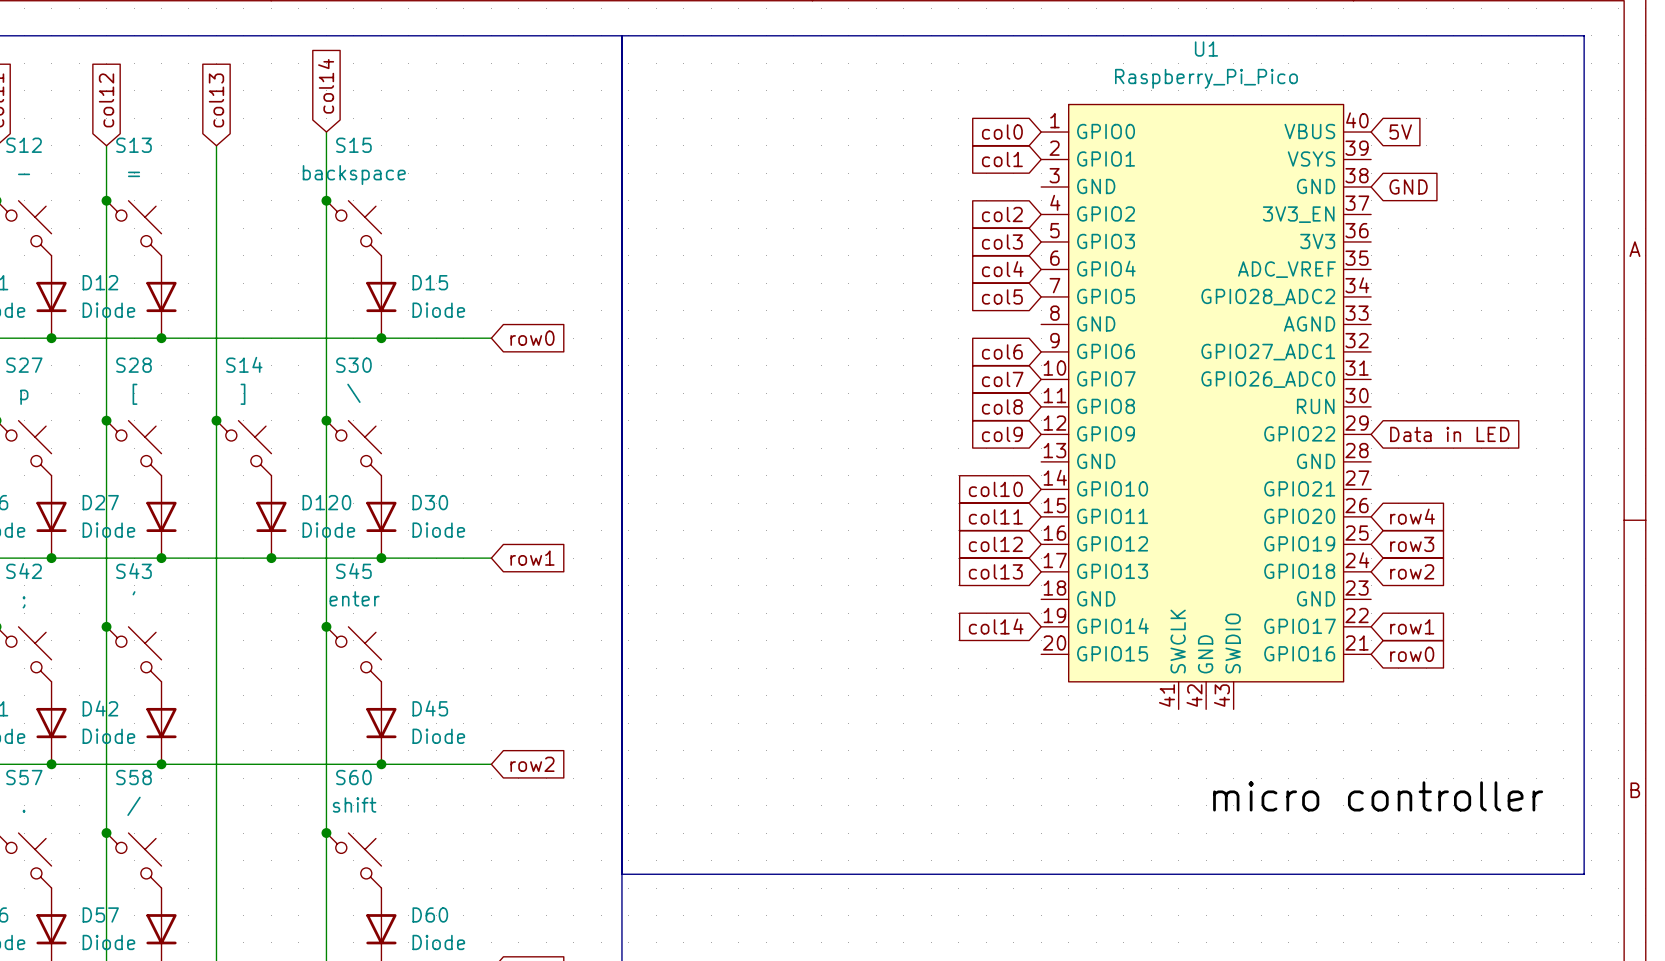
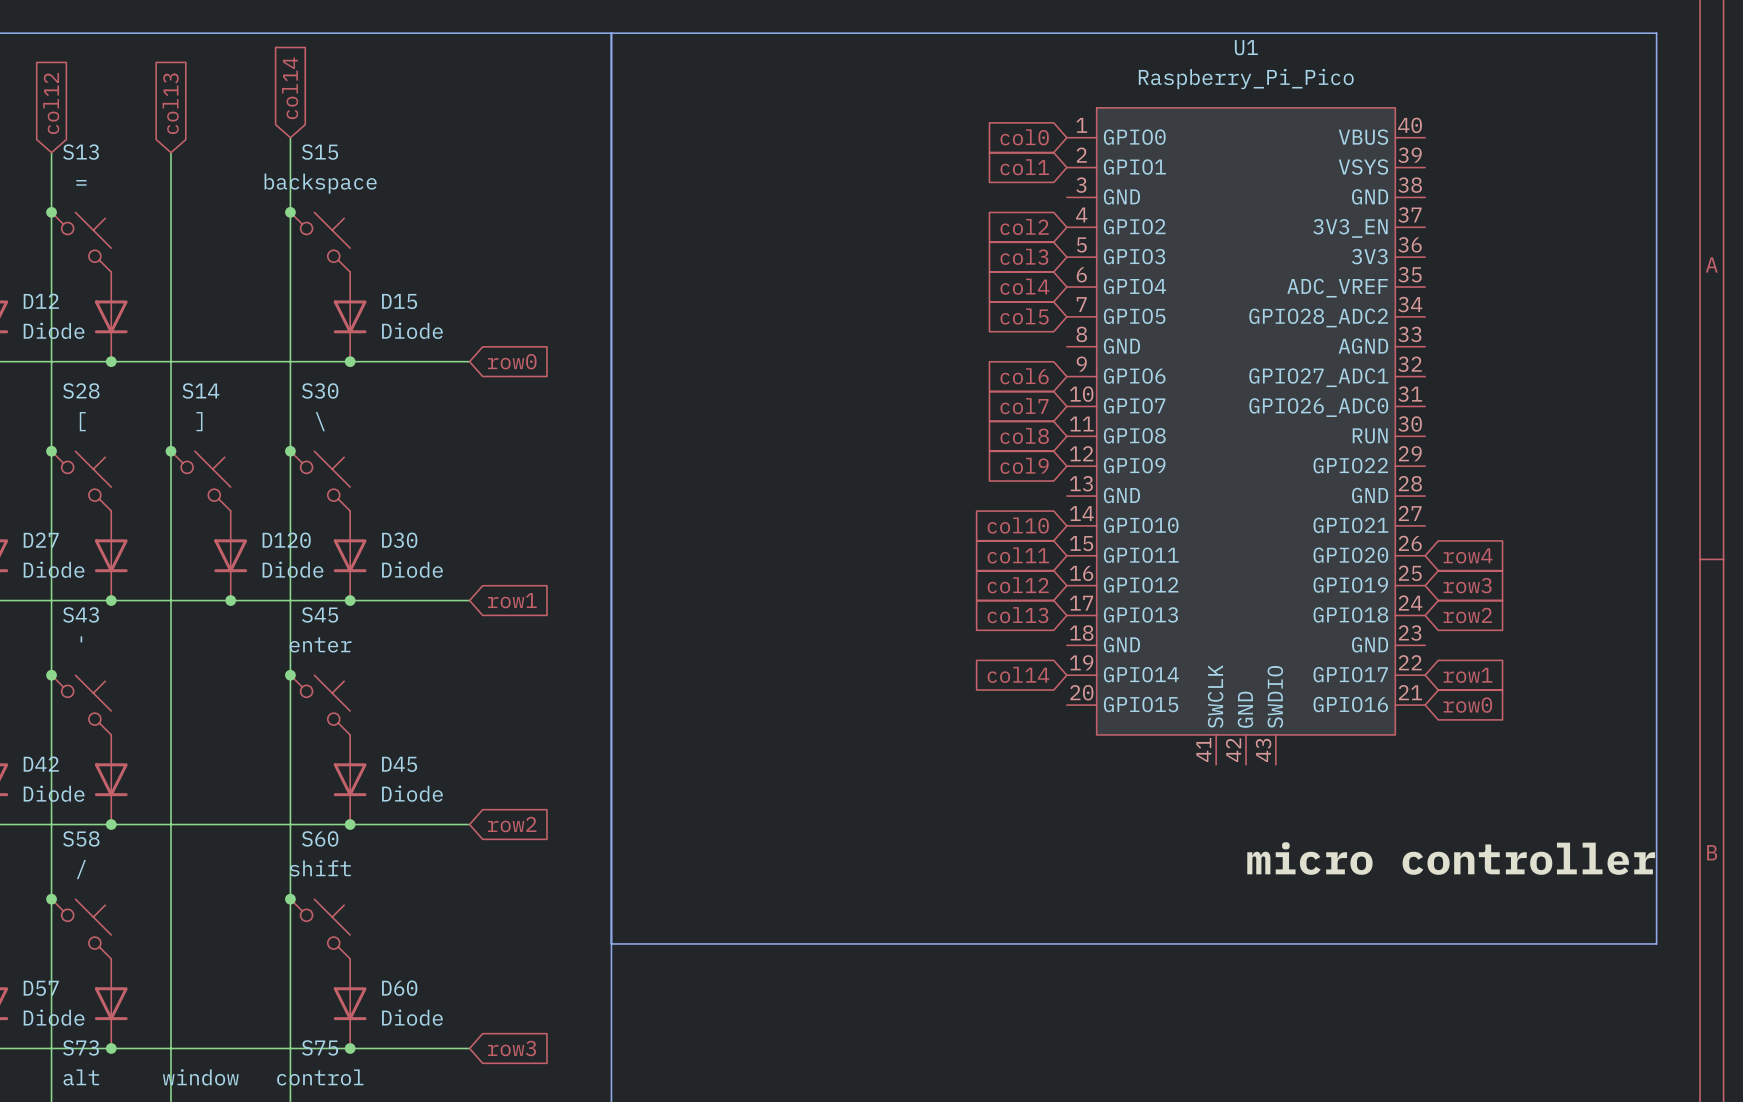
global label: 5V (1400, 132) -> none
global label: GND (1408, 186) -> none
global label: Data in LED (1449, 434) -> none

